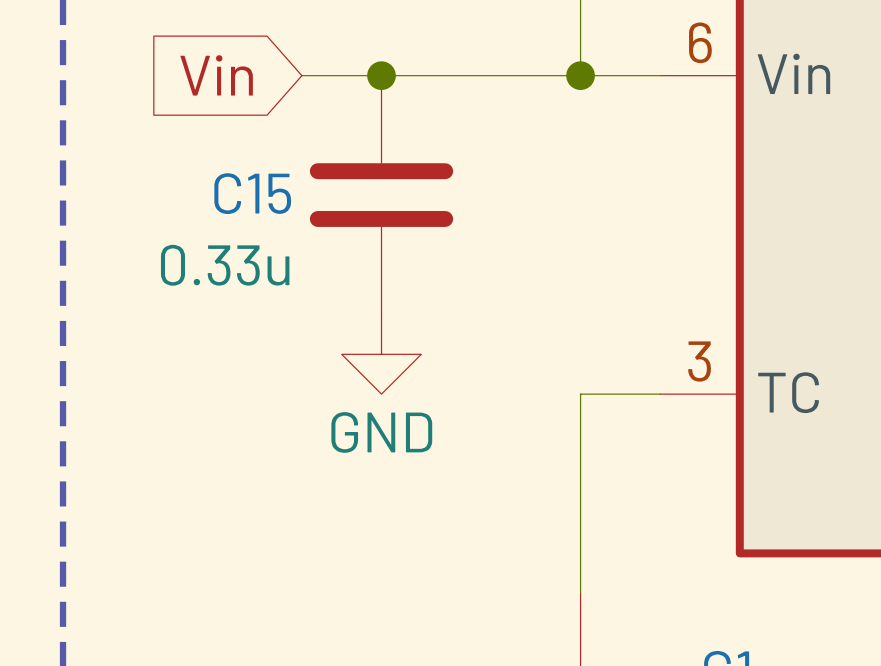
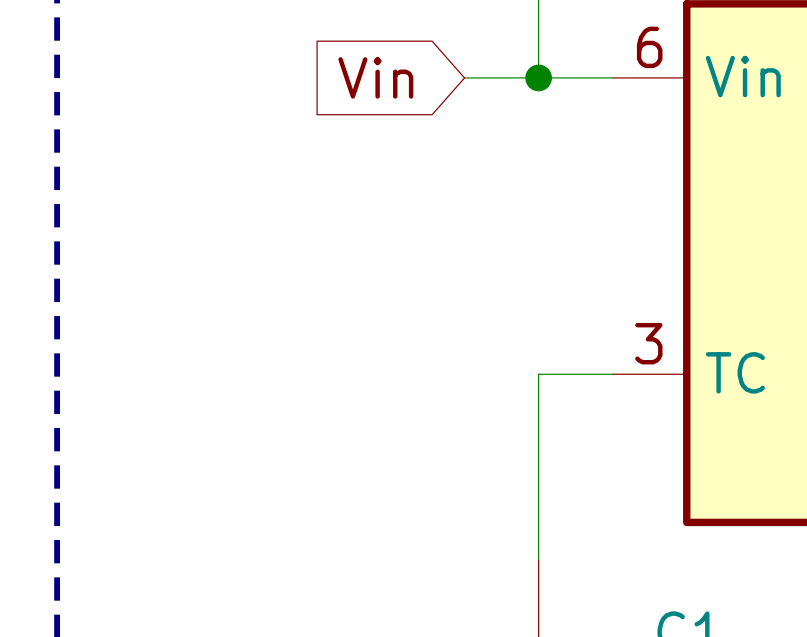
global label position: Vin (216, 75) -> Vin (375, 77)
wire: (301, 75) (500, 75) -> none
junction: (381, 75) -> none
C15: 0.33u (381, 195) -> none
power symbol: GND (381, 354) -> none

